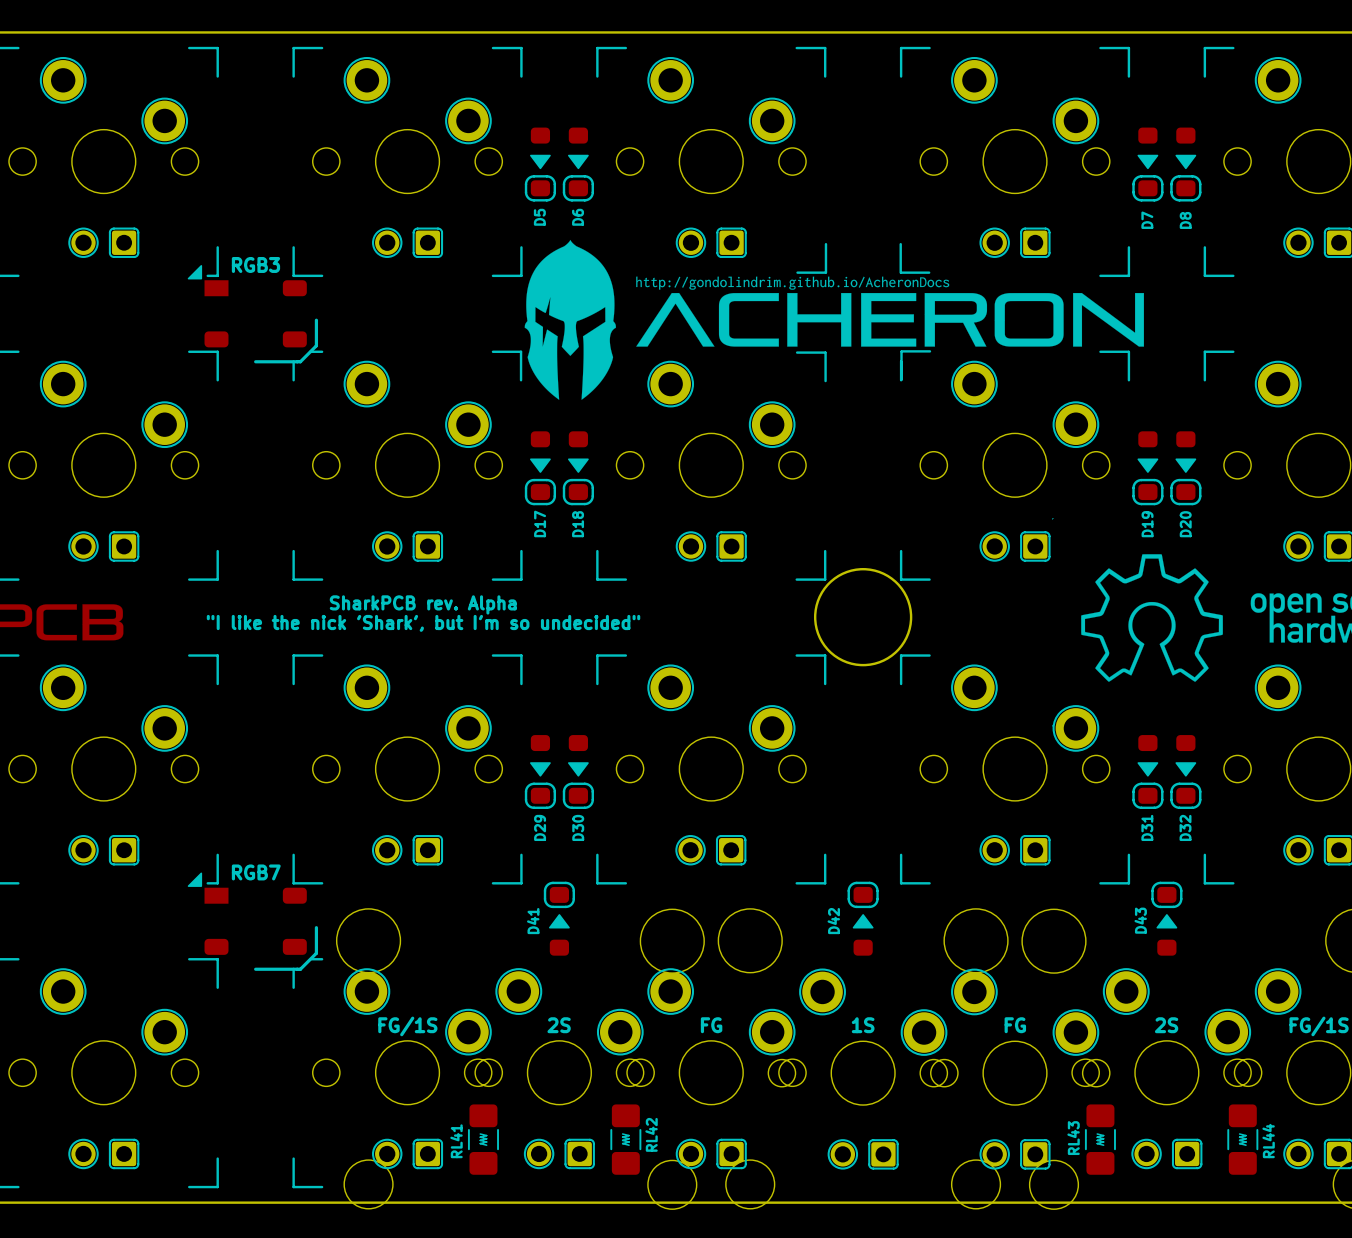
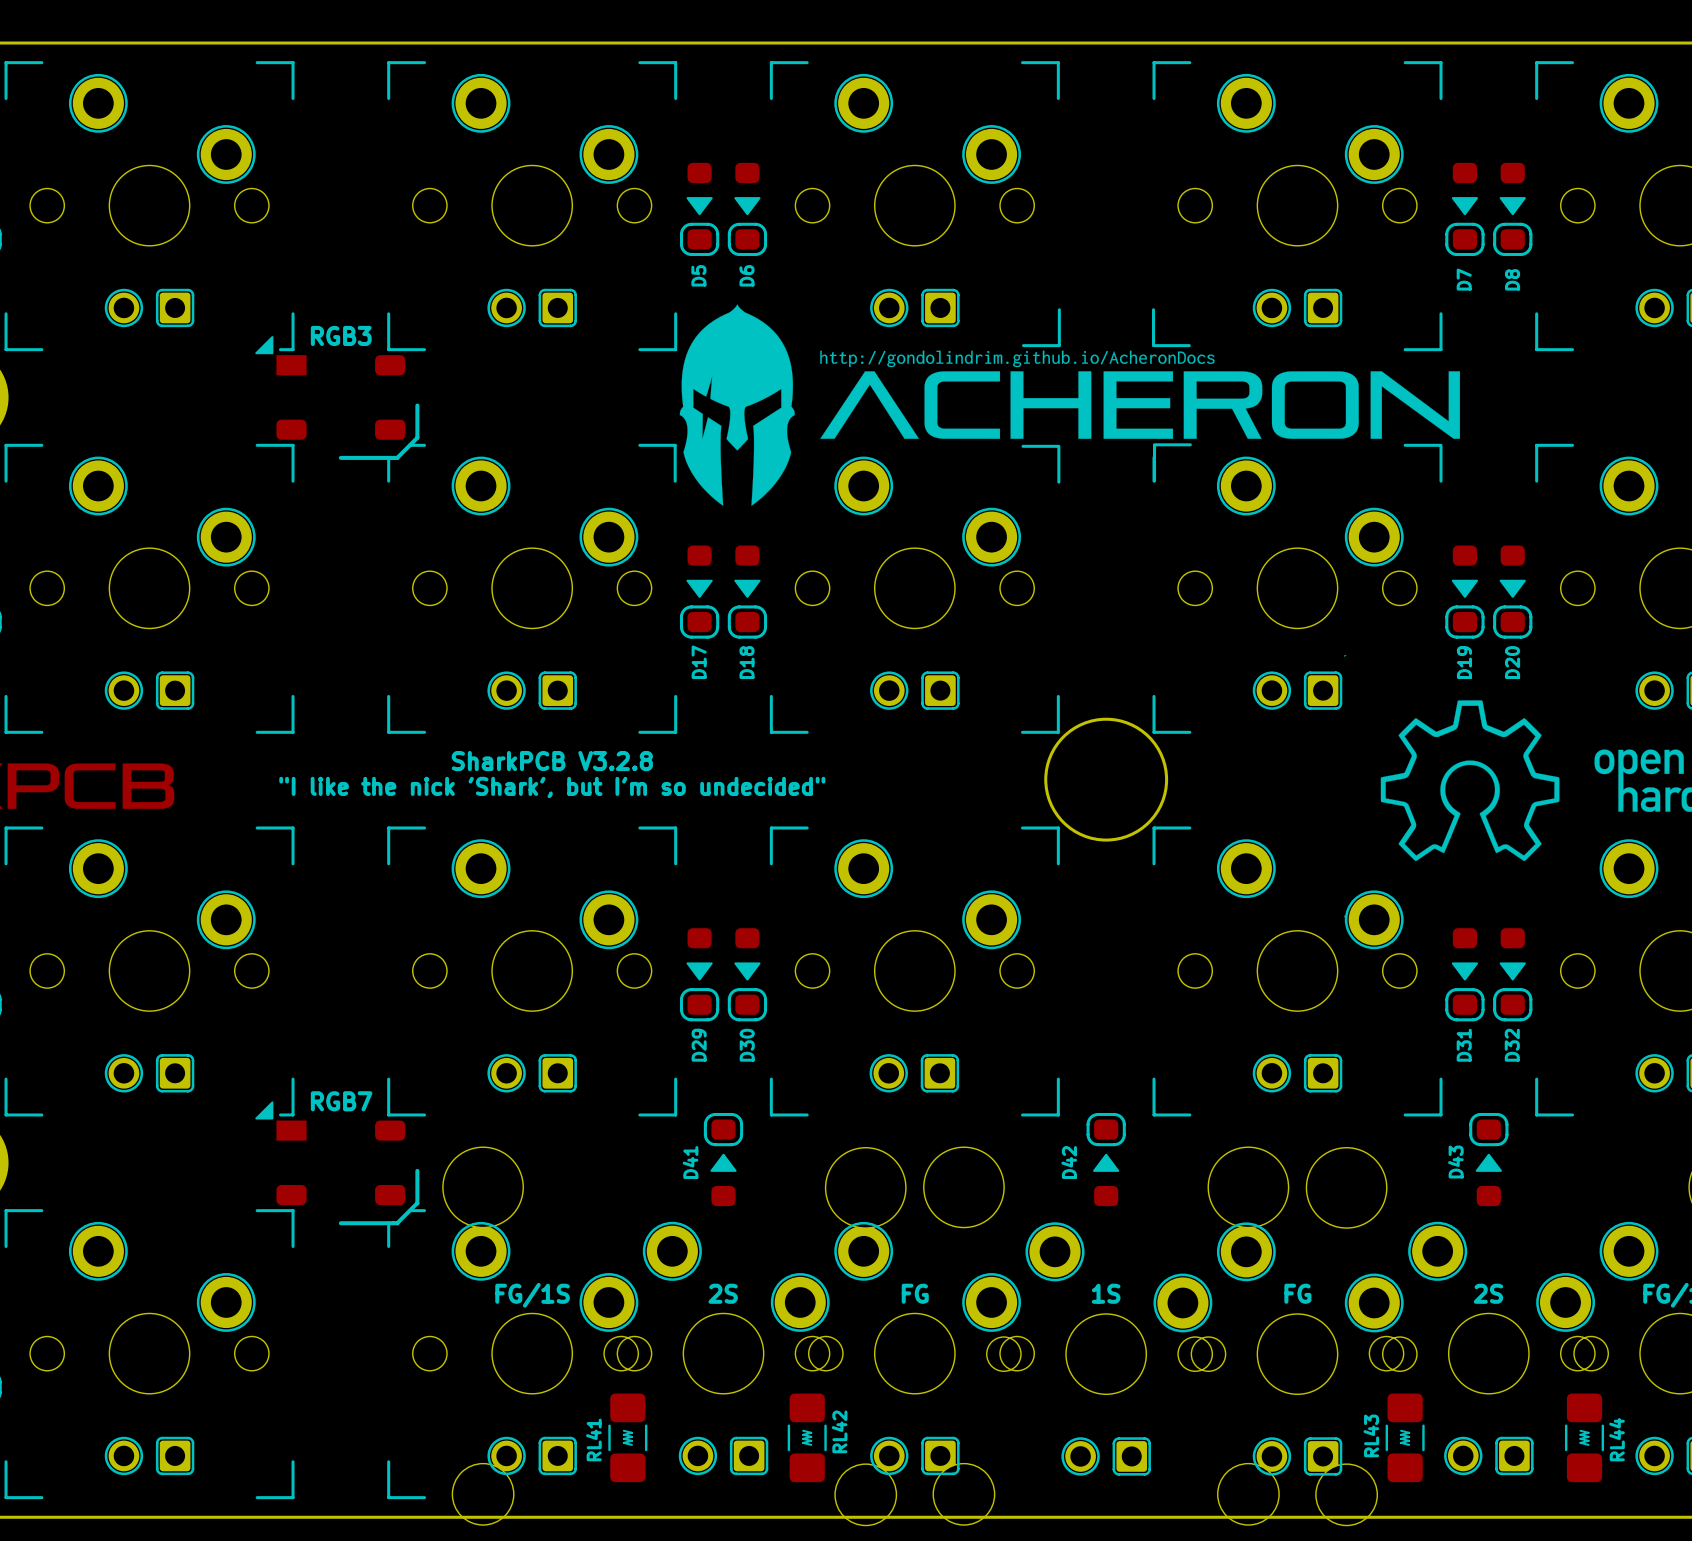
text: SharkPCB rev. Alpha (423, 604) -> SharkPCB V3.2.8 (552, 761)

